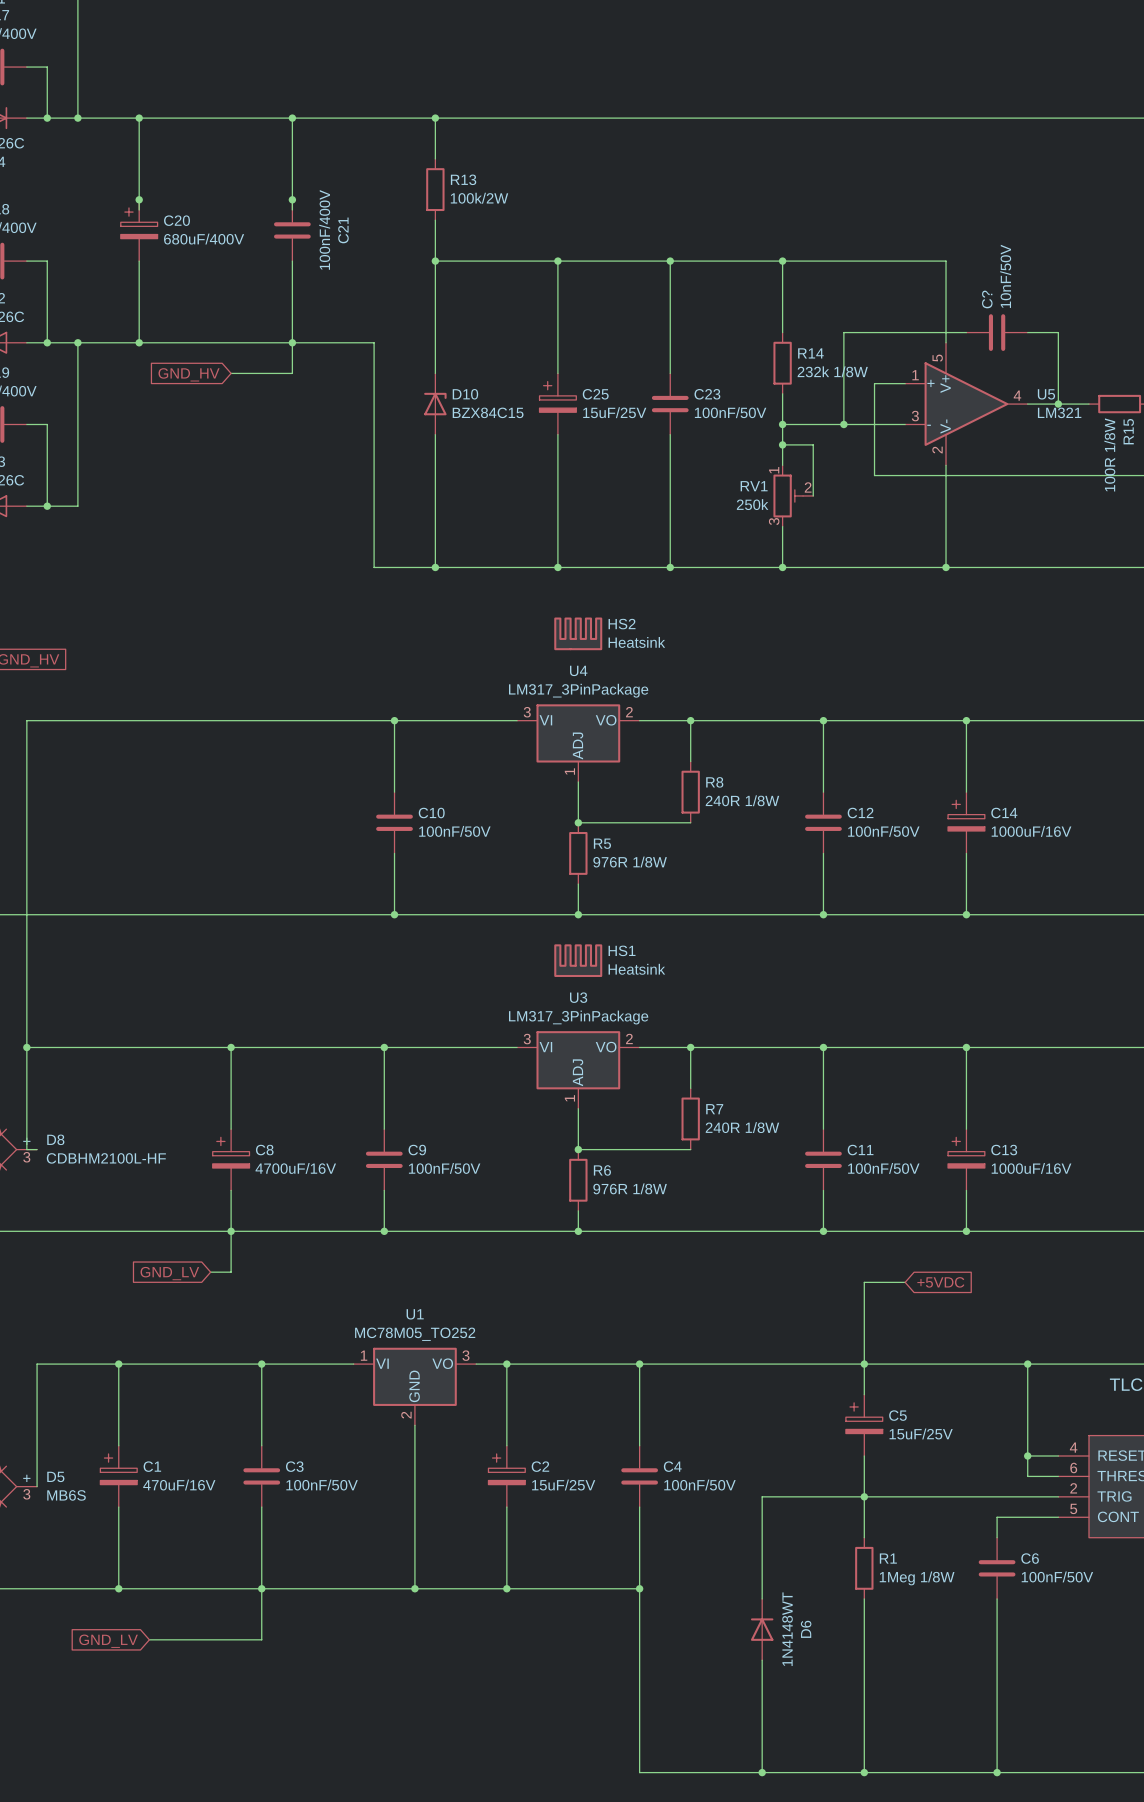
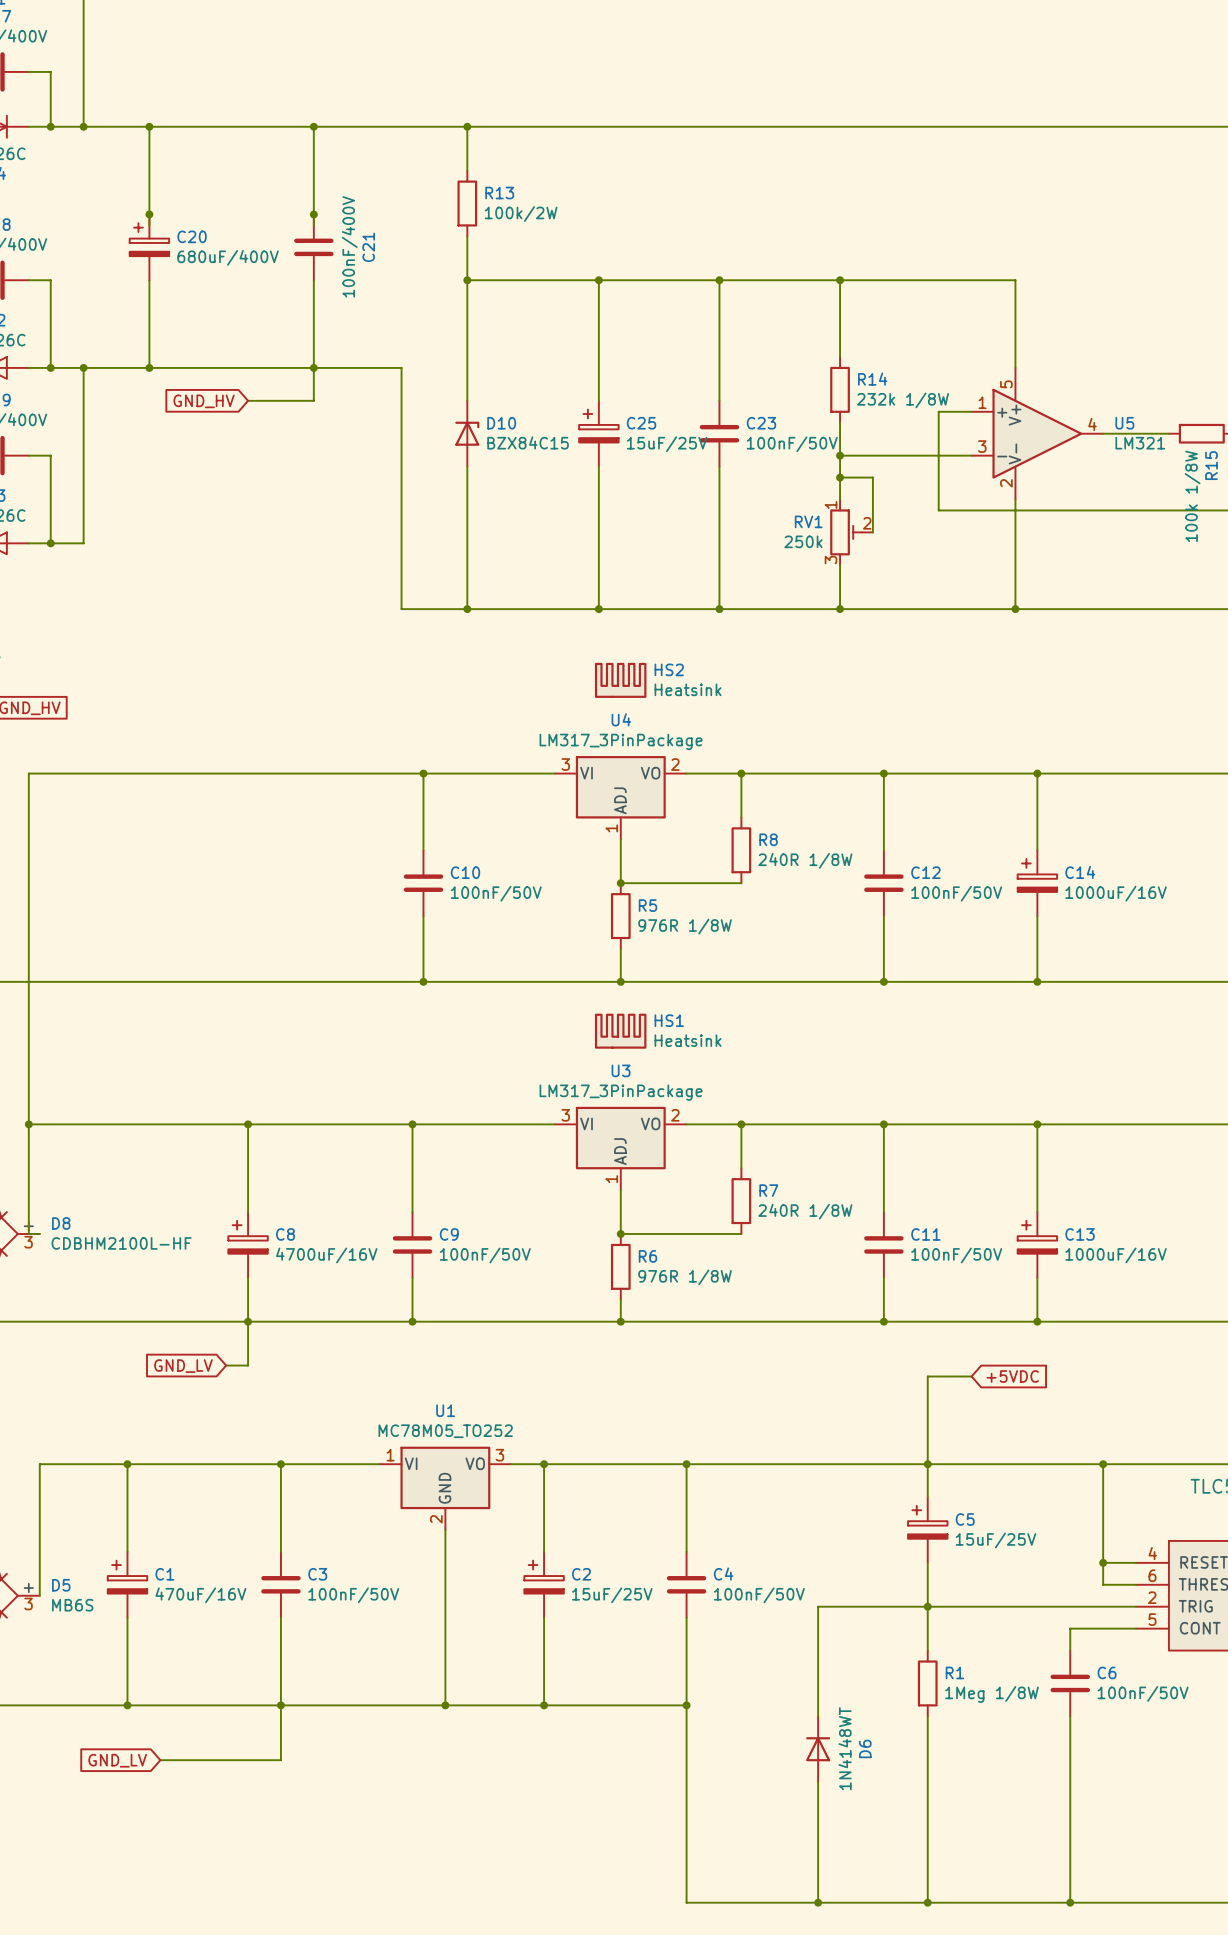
wire: (966, 332) (843, 332) (843, 424) -> none
C?: 10nF/50V (997, 332) -> none
wire: (1027, 332) (1058, 332) (1058, 404) -> none
junction: (1058, 404) -> none
junction: (843, 424) -> none
R15 value: 100R 1/8W (1109, 454) -> 100k 1/8W (1192, 496)

